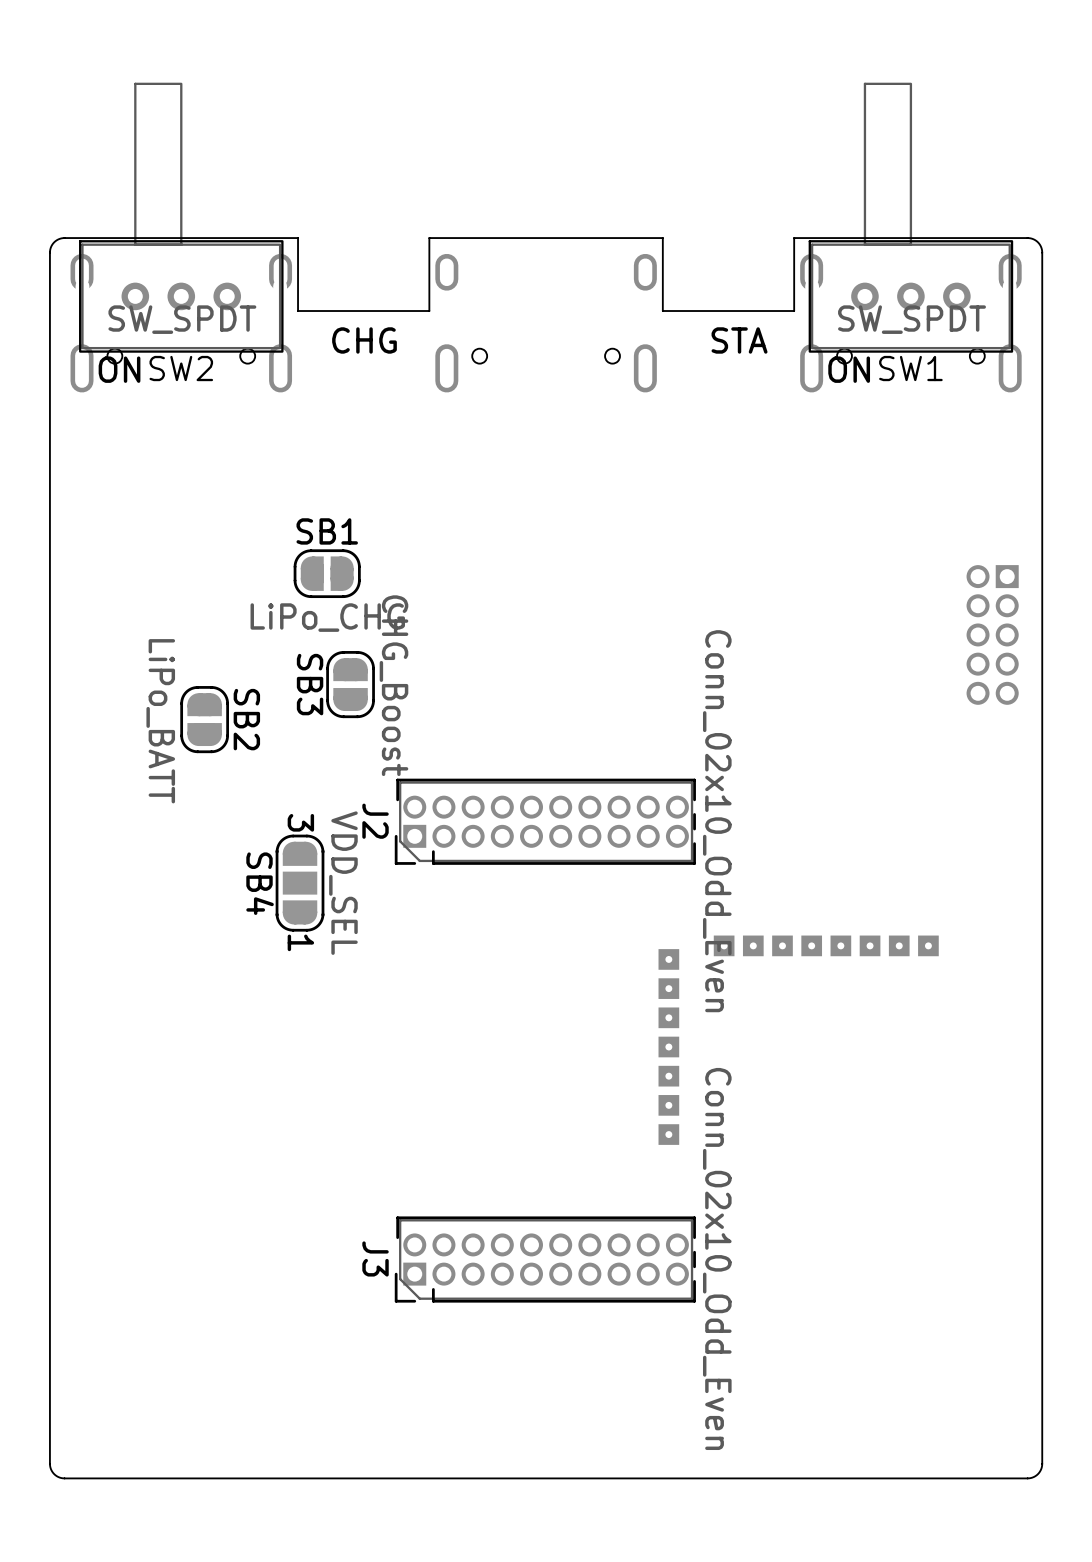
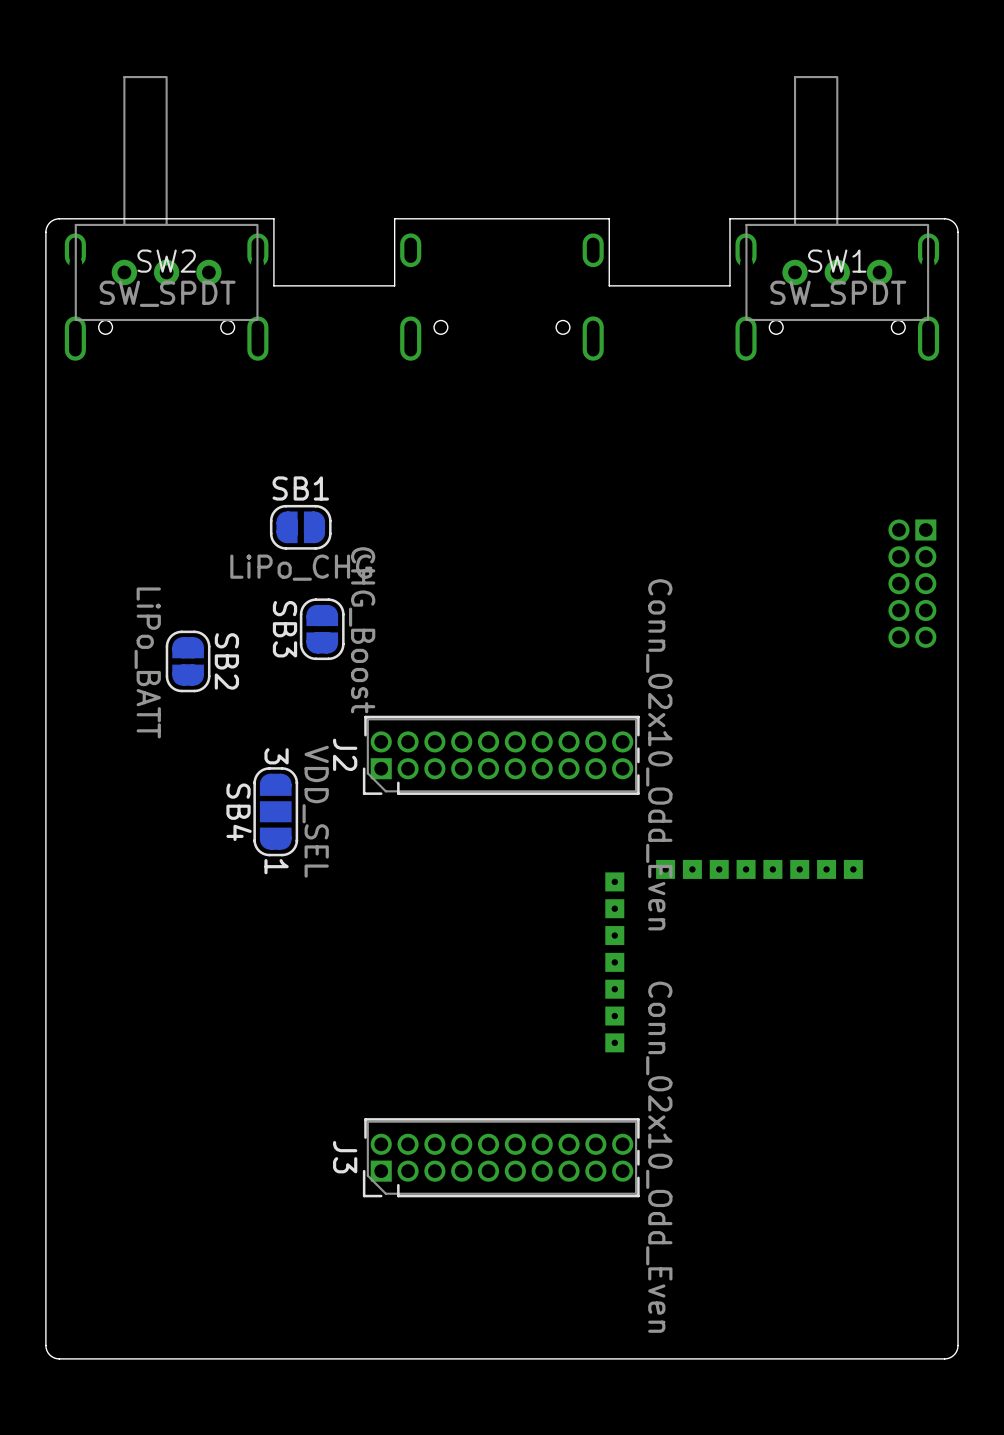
SW2 footprint: [75, 82, 287, 353] -> [69, 76, 264, 322]
SW1 footprint: [805, 82, 1017, 353] -> [740, 76, 935, 322]
text: CHG (364, 340) -> none
text: STA (739, 340) -> none
SW2 name position: SW2 (181, 368) -> SW2 (166, 261)
SW1 name position: SW1 (910, 368) -> SW1 (837, 261)
text: ON (119, 369) -> none
text: ON (849, 369) -> none

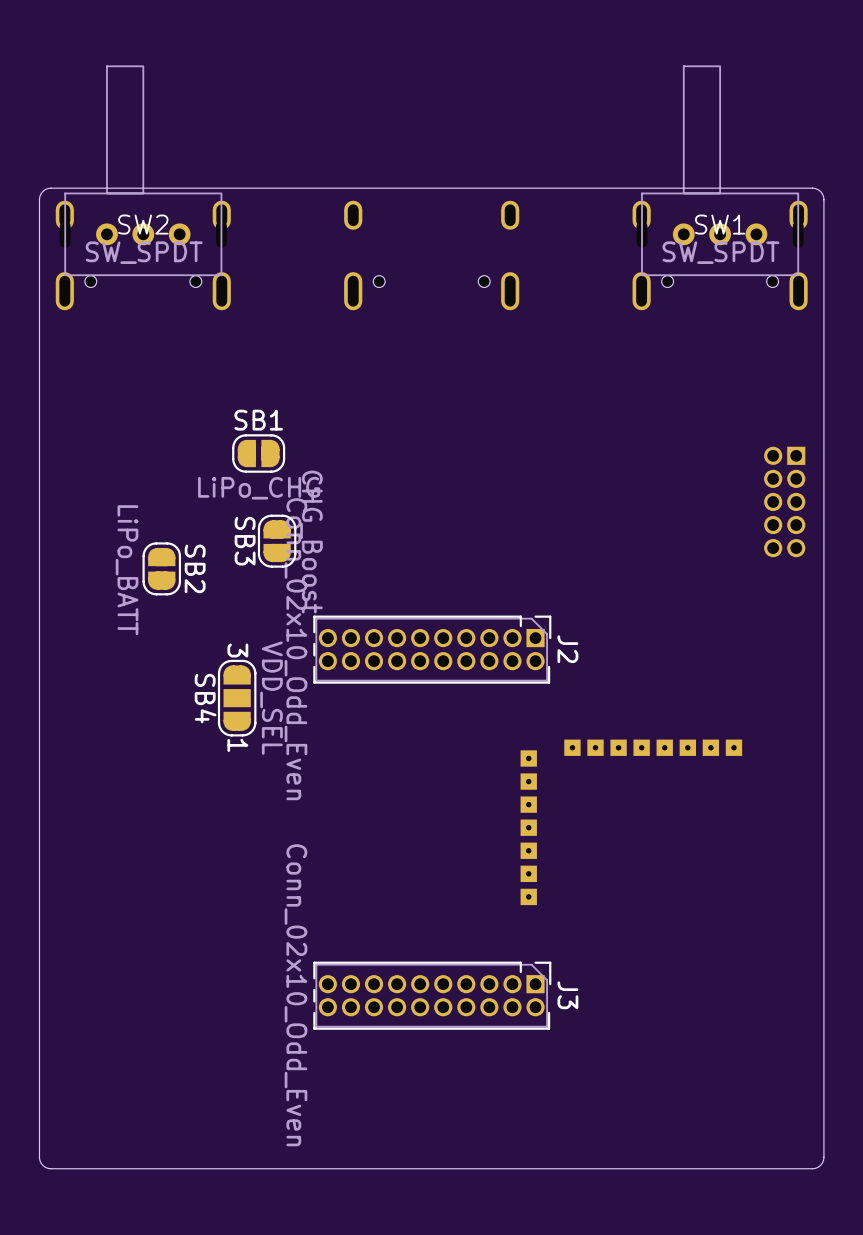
board edge: (394, 218) (394, 285) (273, 285) (273, 218) -> (339, 188) (235, 188)
board edge: (729, 218) (729, 285) (609, 285) (609, 218) -> (627, 188) (524, 188)
J2 rotation: 0° (501, 755) -> 180° (432, 649)
J3 rotation: 0° (501, 1157) -> 180° (432, 995)

